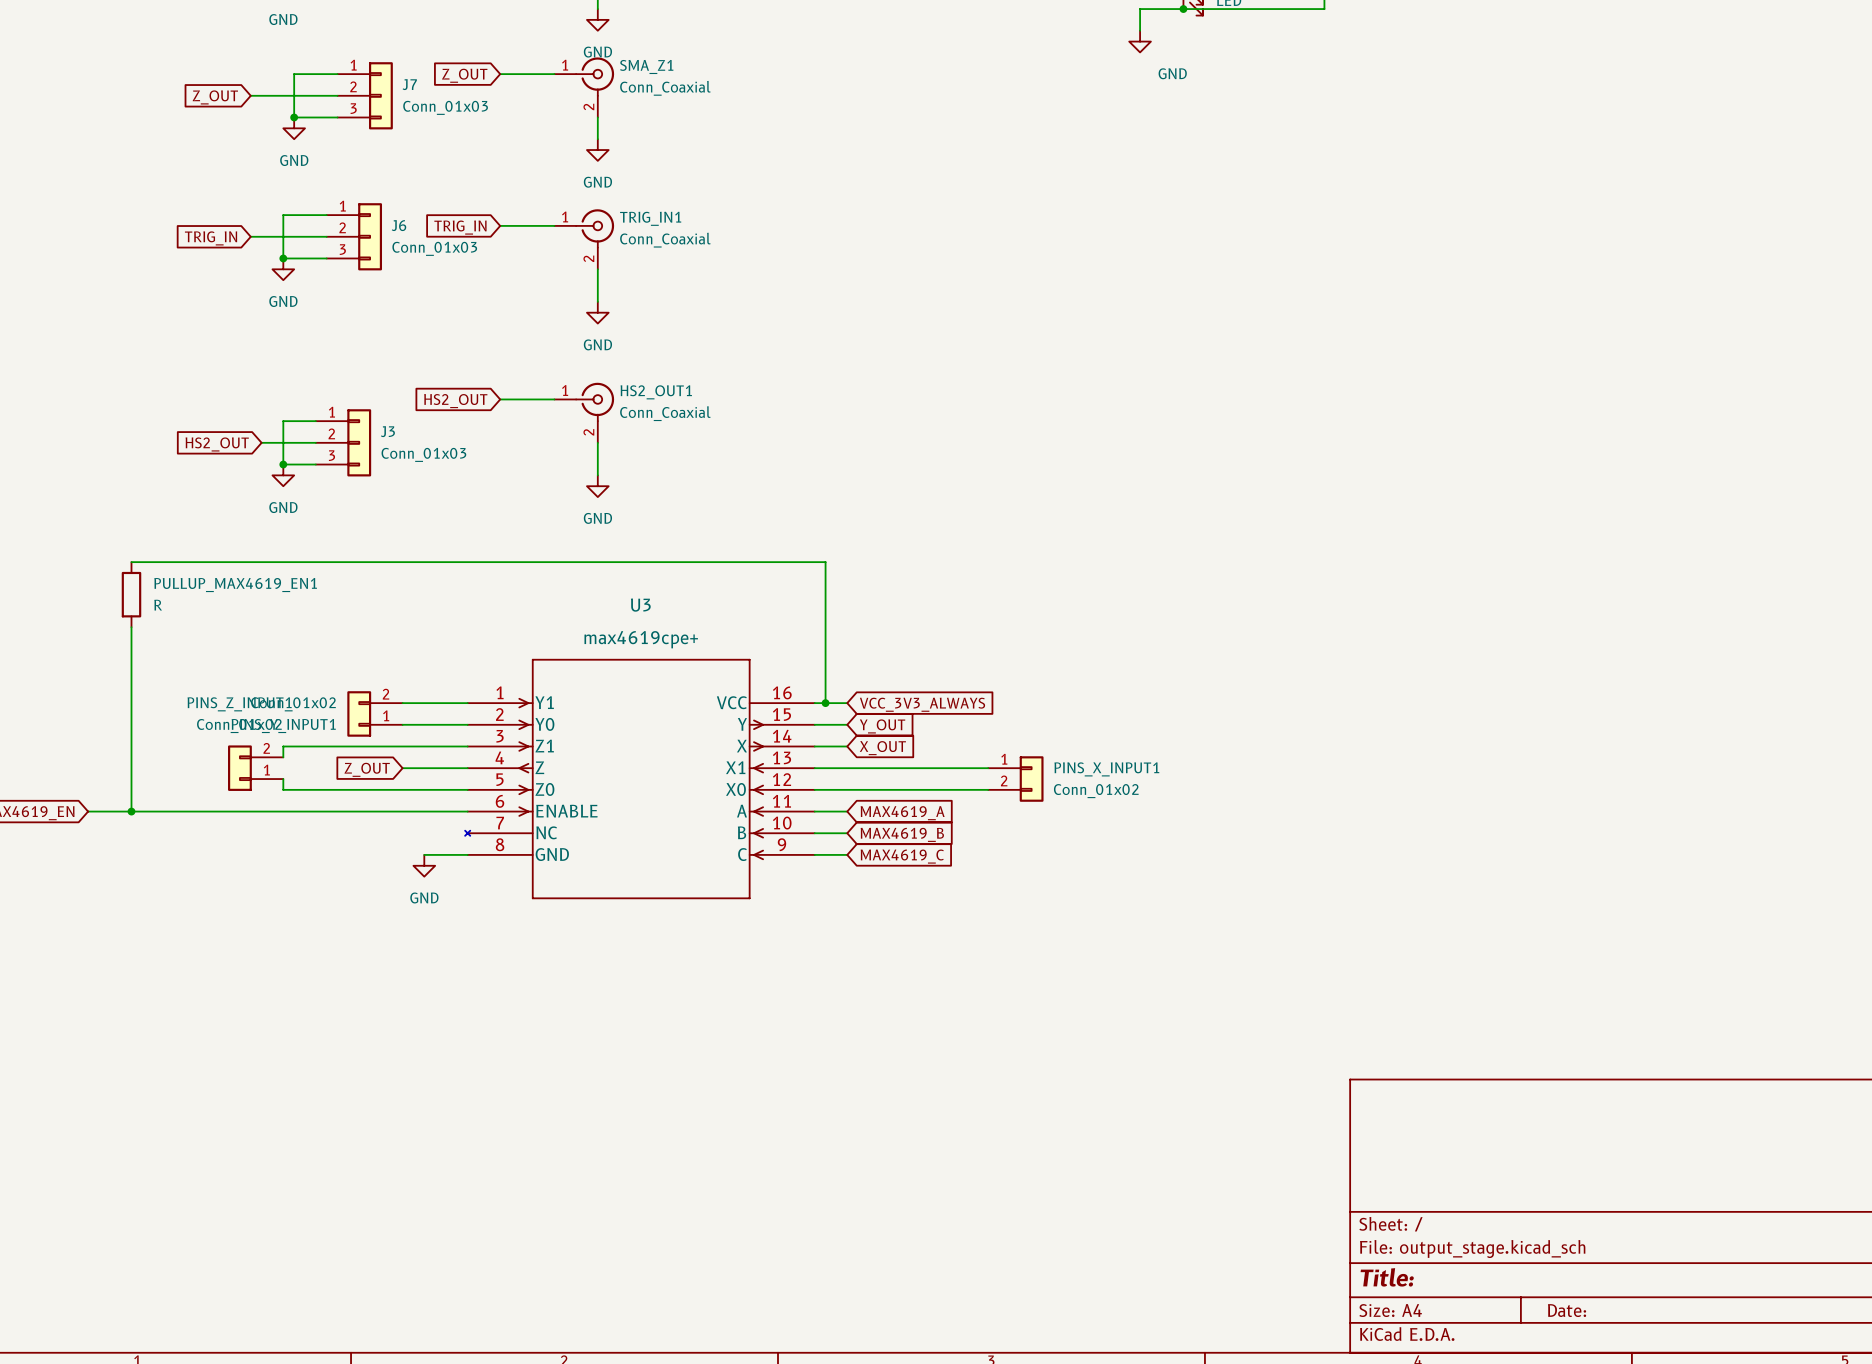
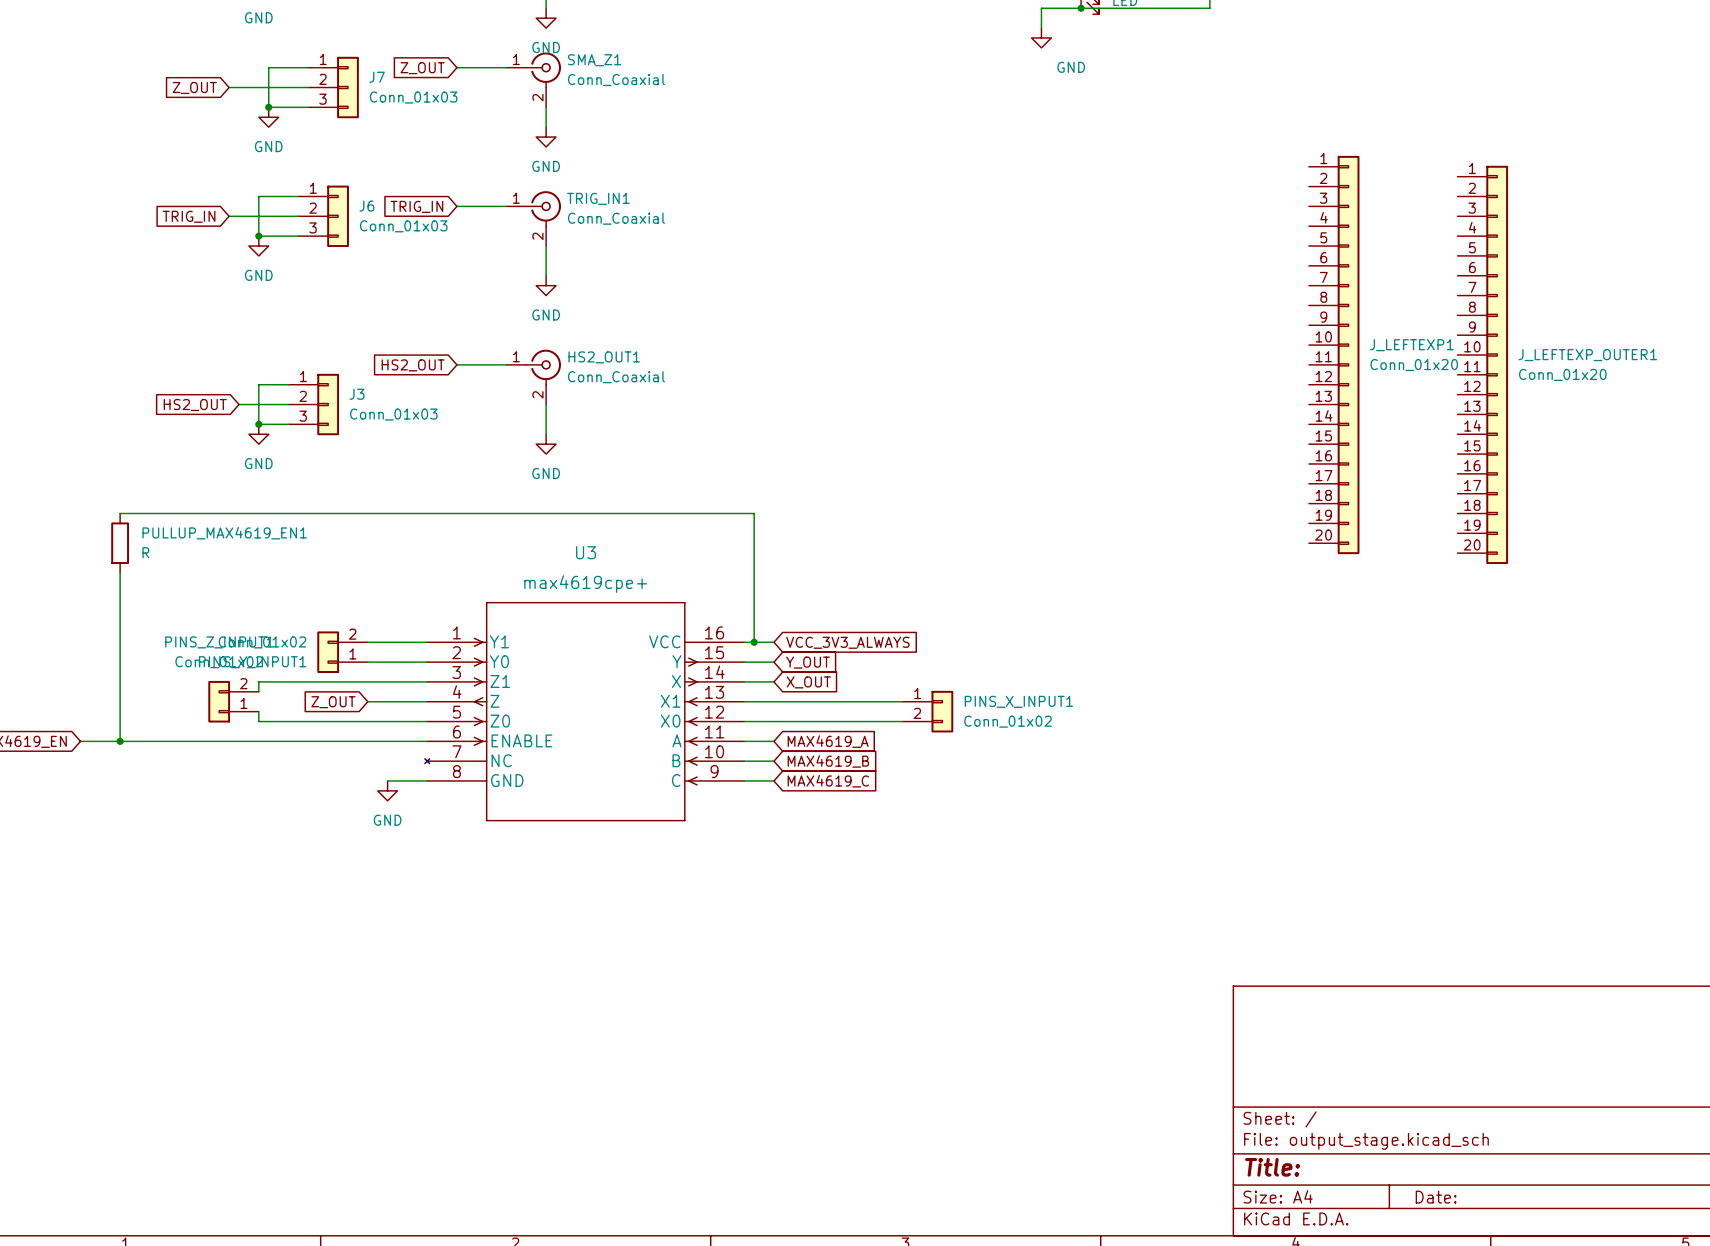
J_LEFTEXP1: none -> Conn_01x20 (1334, 355)
J_LEFTEXP_OUTER1: none -> Conn_01x20 (1482, 364)

